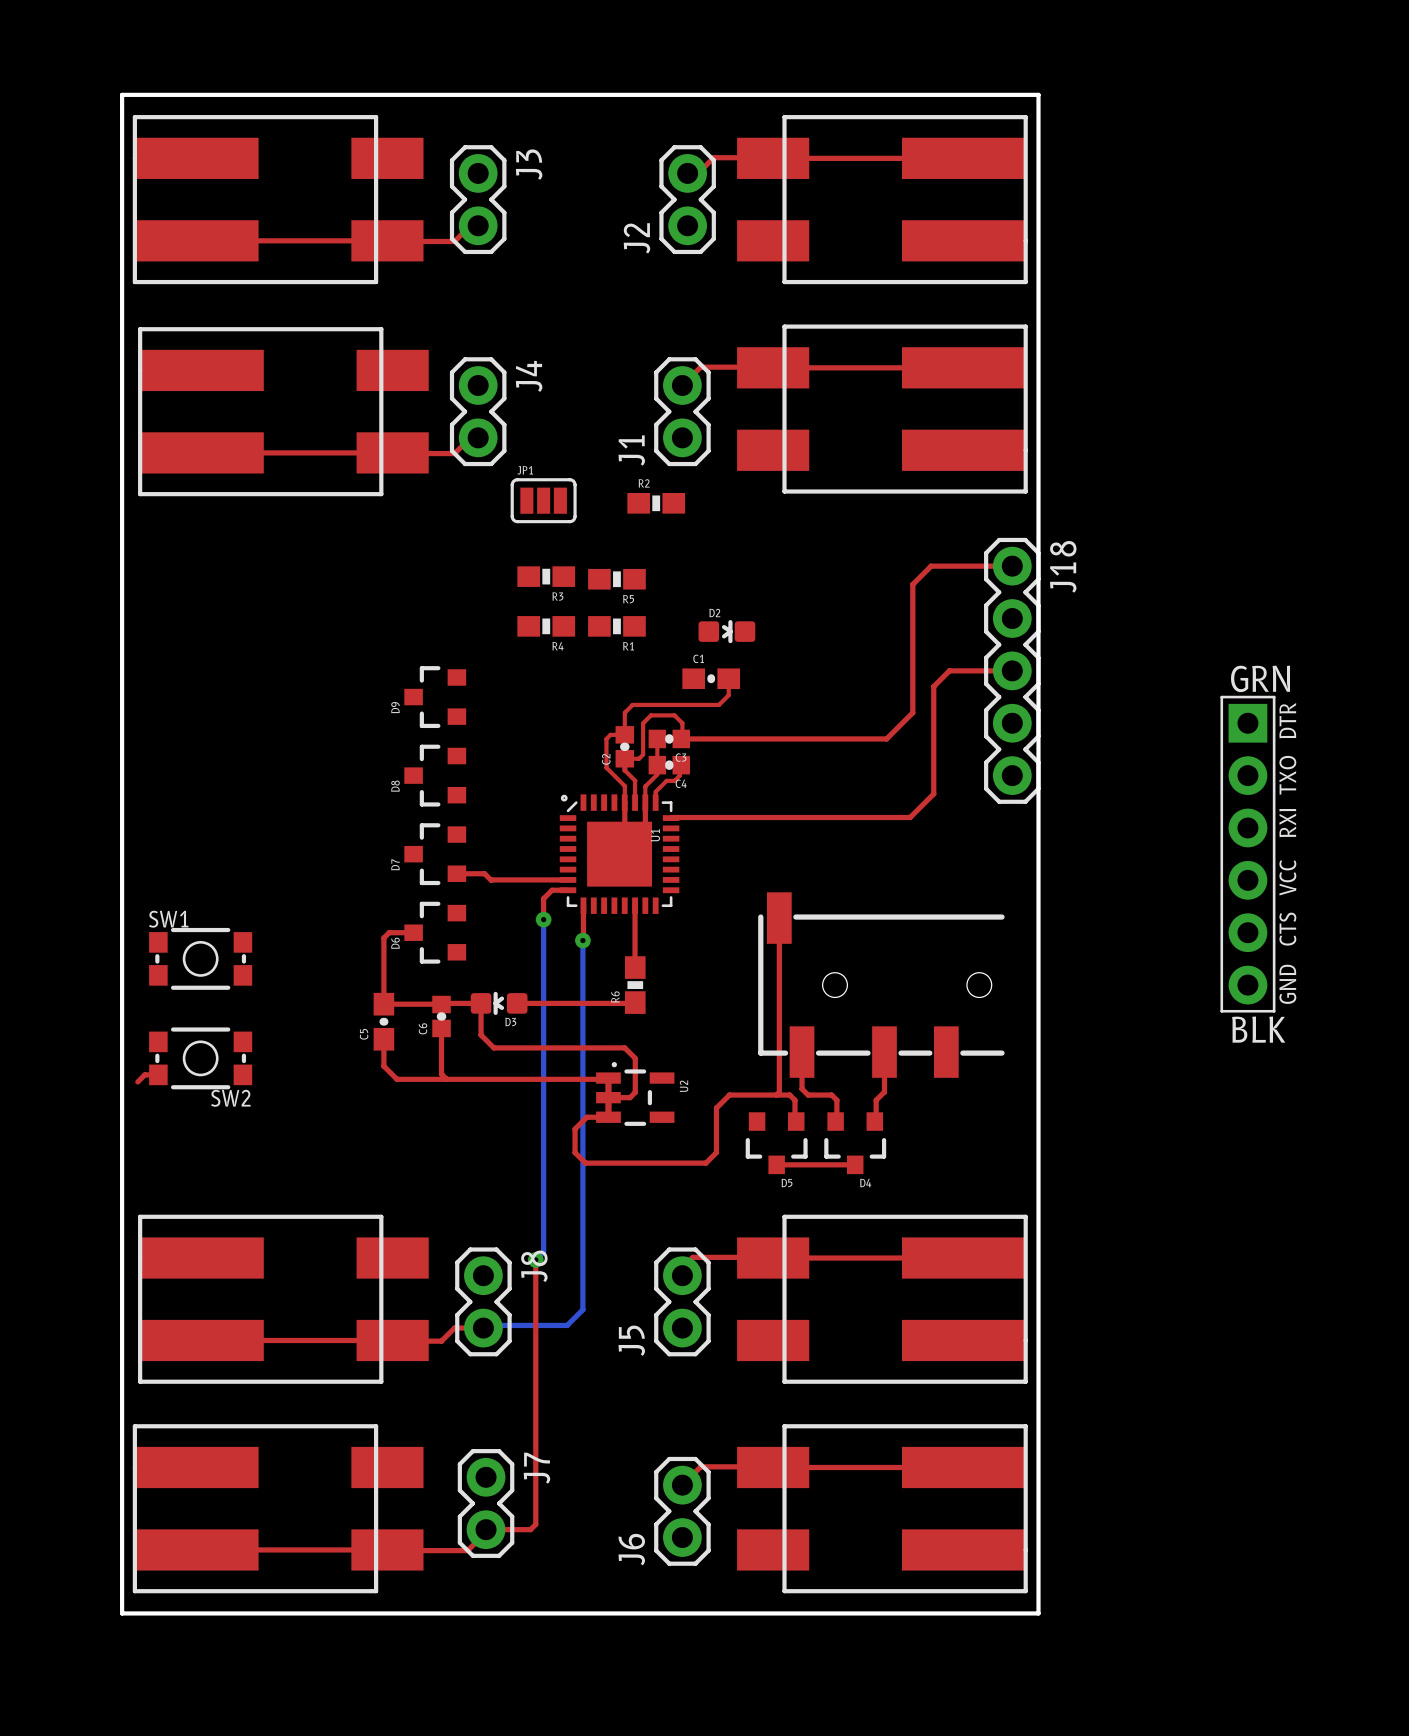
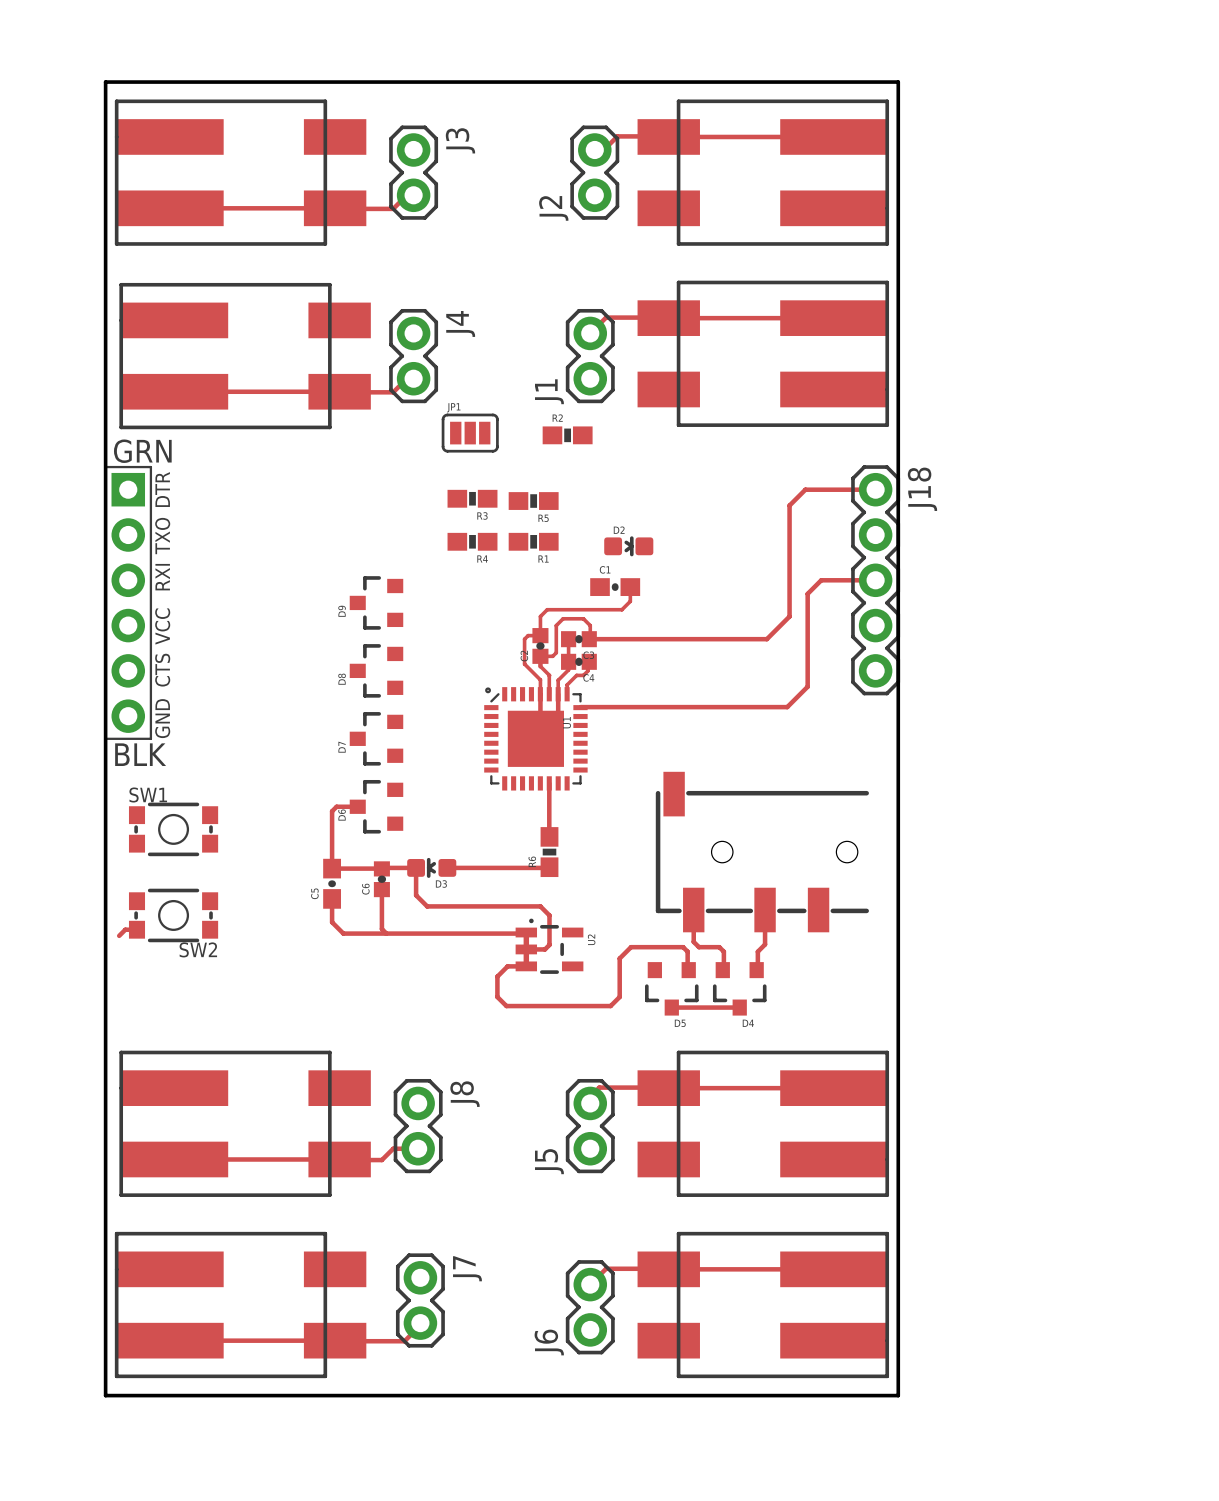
part: none -> (128, 602)
part: (1247, 854) -> none
top track: (456, 873) (484, 873) (491, 880) (568, 879) -> none
top track: (568, 890) (552, 890) (543, 898) (543, 919) -> none
top track: (583, 905) (582, 940) -> none
top track: (779, 918) (779, 1092) (776, 1095) -> none
bottom track: (543, 919) (543, 1252) (535, 1259) -> none
via: (543, 919) -> none
bottom track: (582, 940) (582, 1309) (567, 1325) (486, 1325) (483, 1328) -> none
via: (582, 940) -> none
top track: (535, 1259) (535, 1524) (530, 1529) (486, 1529) -> none
via: (535, 1259) -> none

